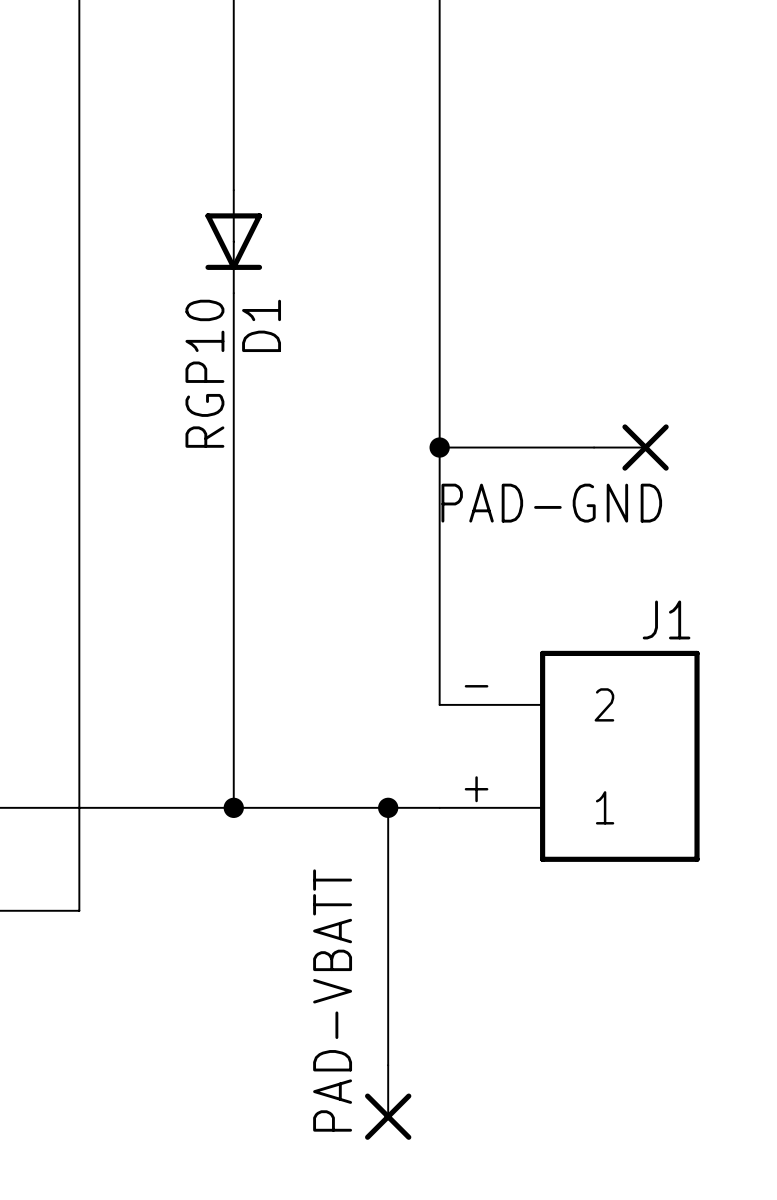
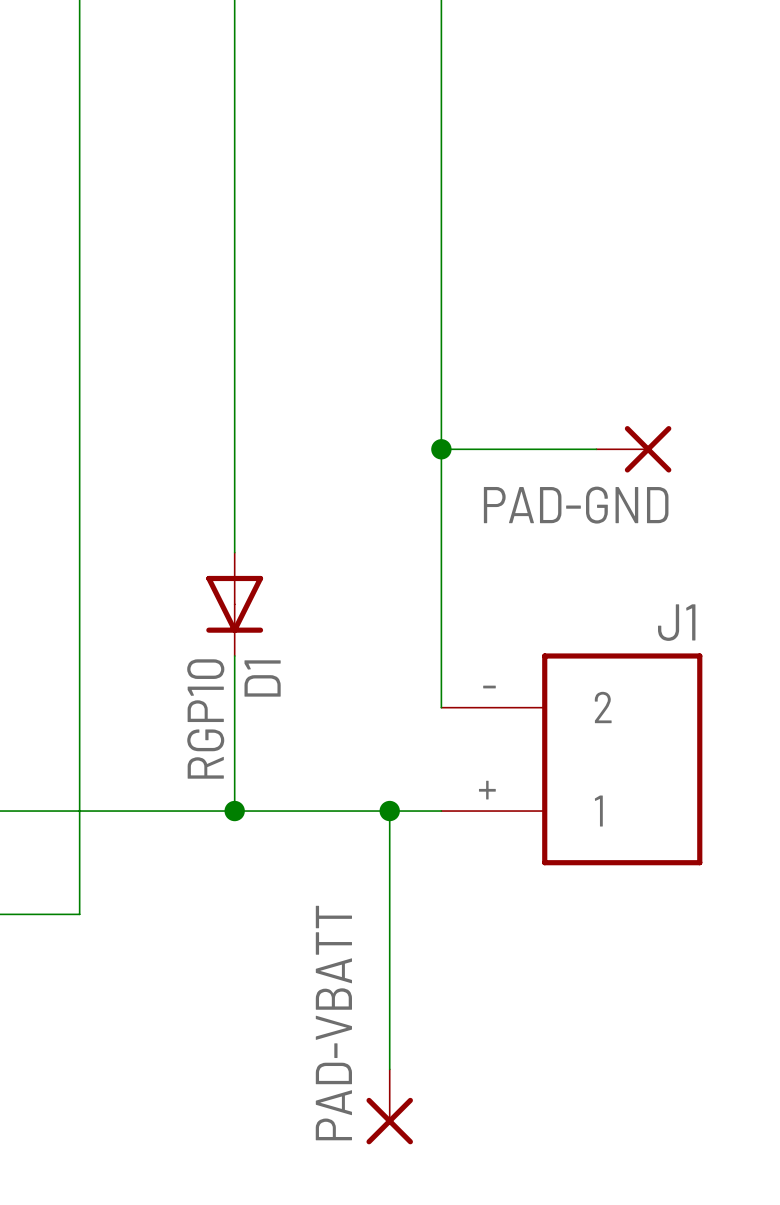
D1 position: (233, 241) -> (234, 604)

